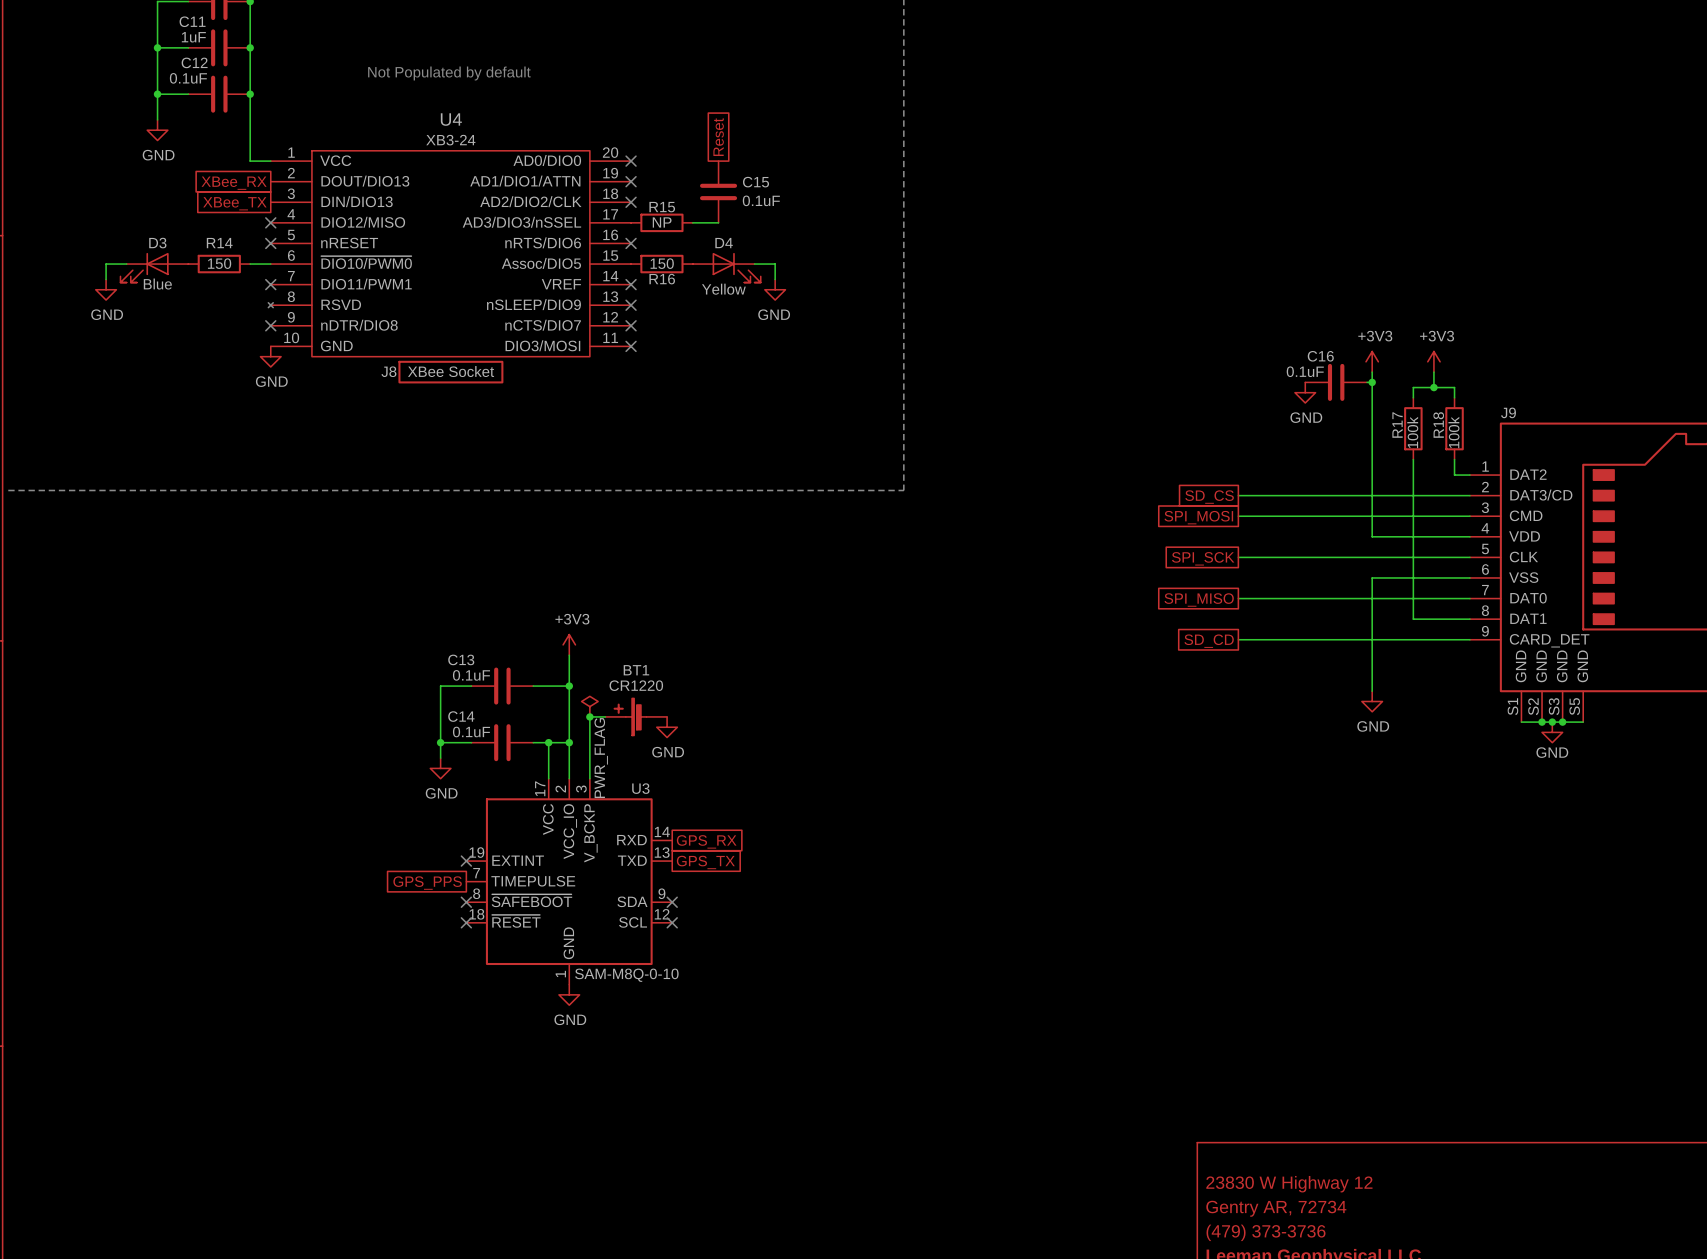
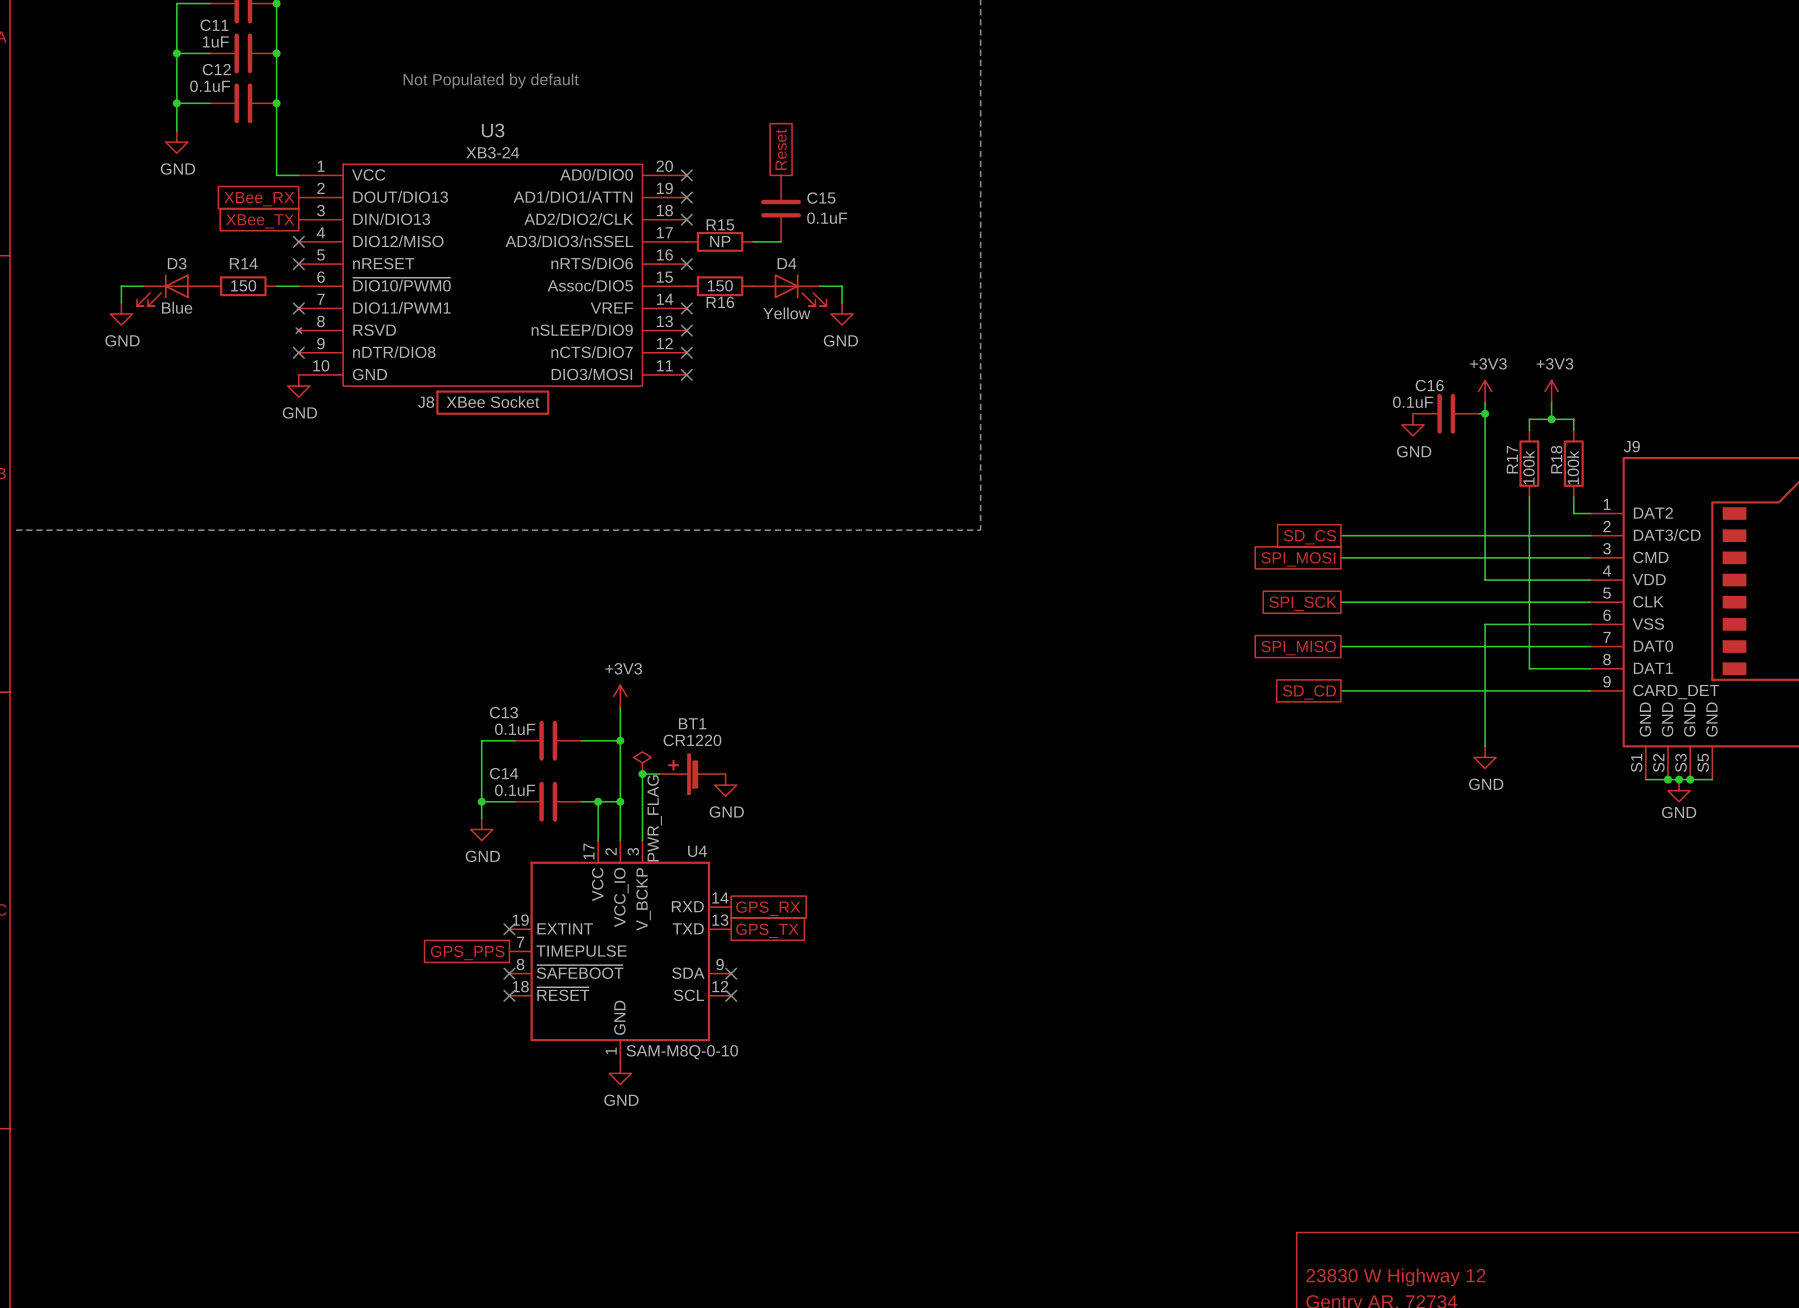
U4 name: U4 (451, 119) -> U3 (493, 130)
U3 name: U3 (640, 788) -> U4 (697, 851)

